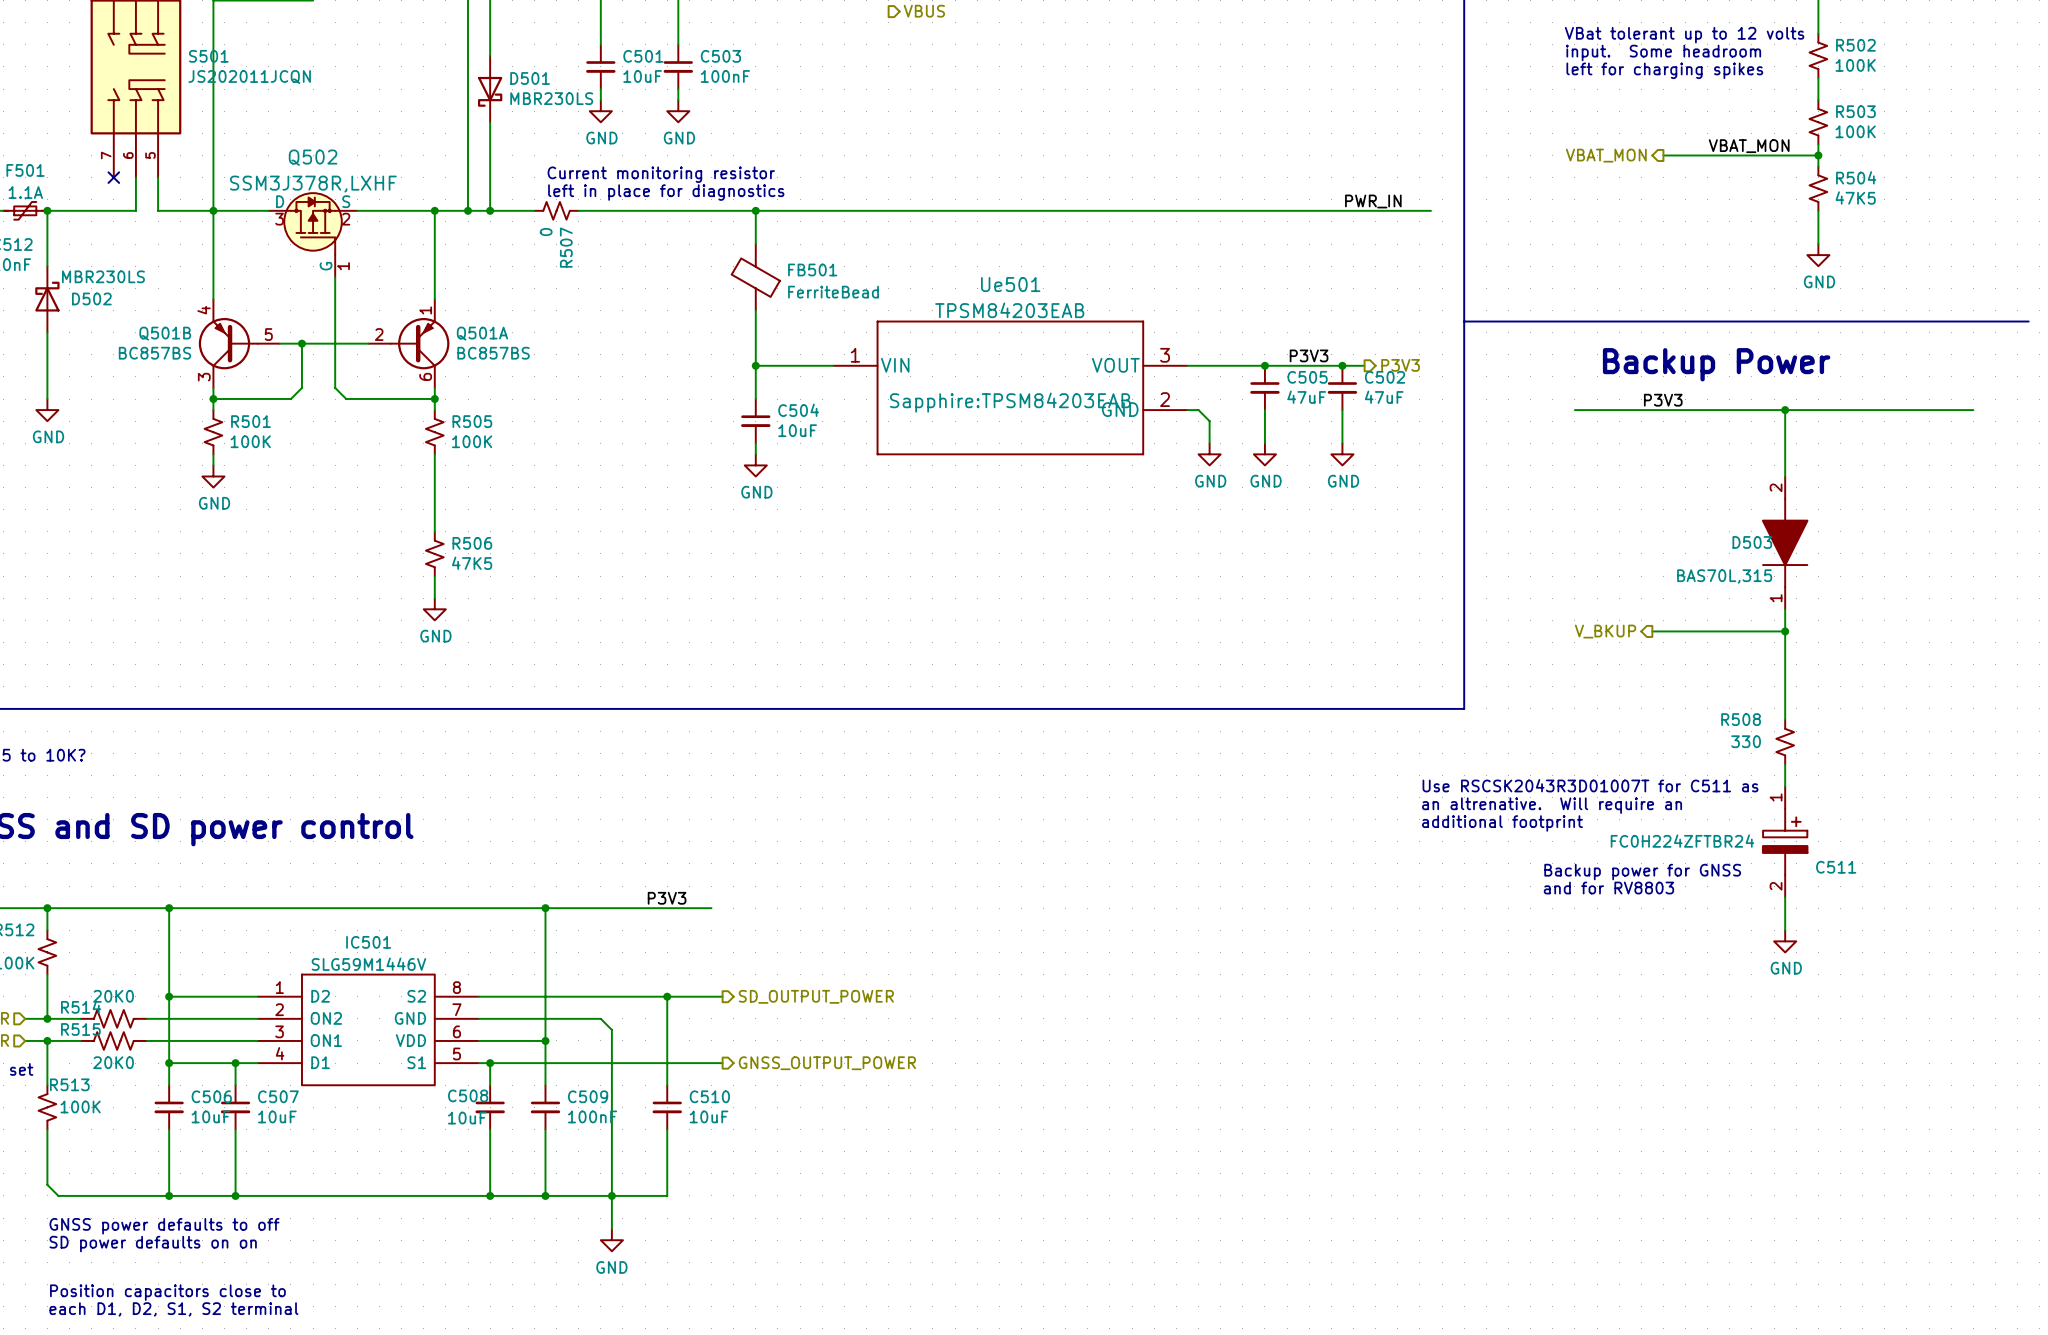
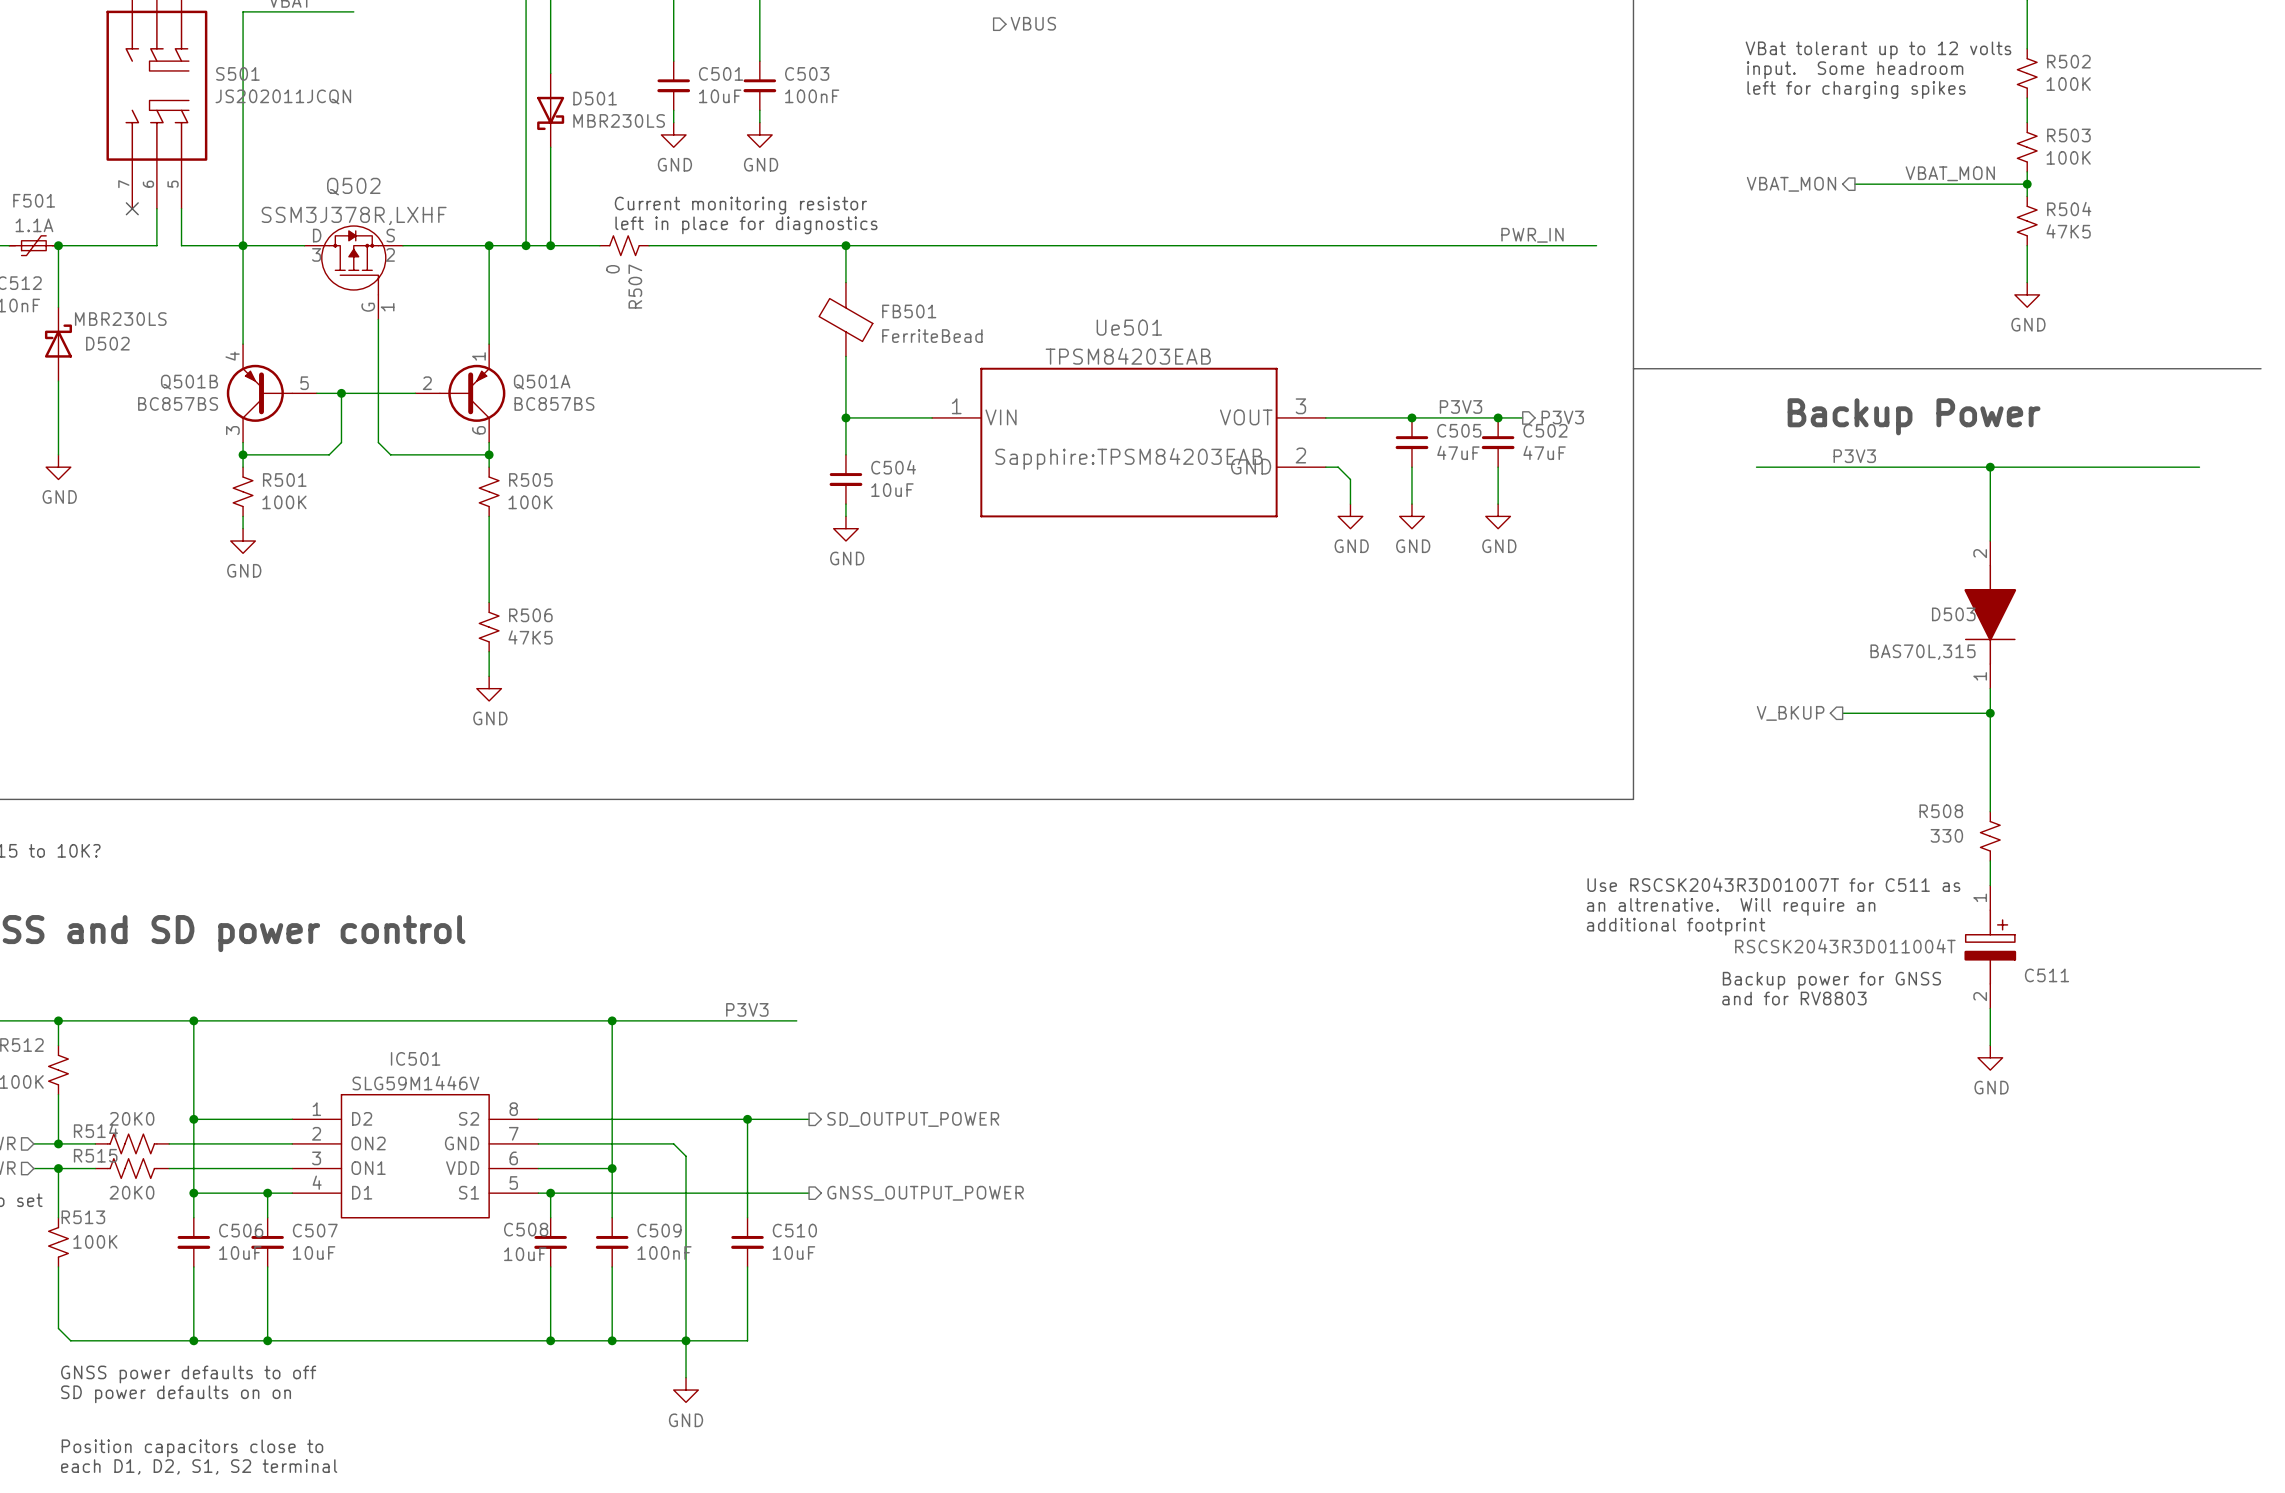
C511 value: FC0H224ZFTBR24 (1682, 841) -> RSCSK2043R3D011004T (1845, 946)

